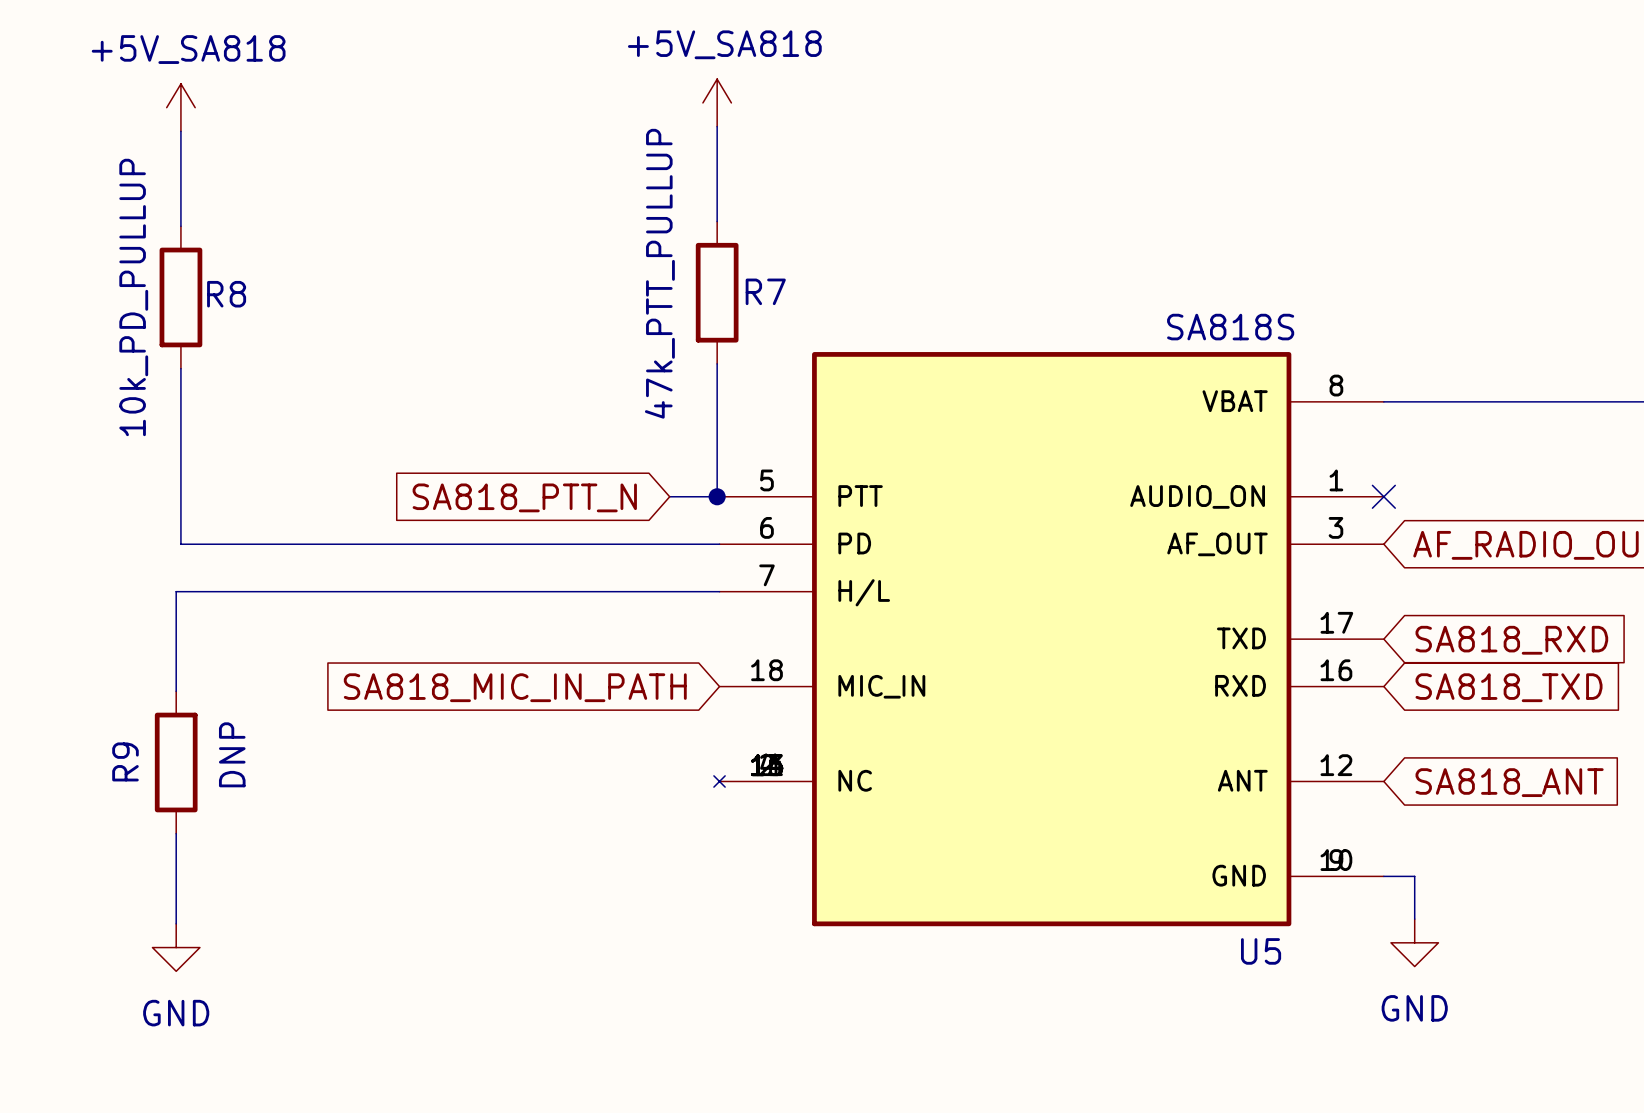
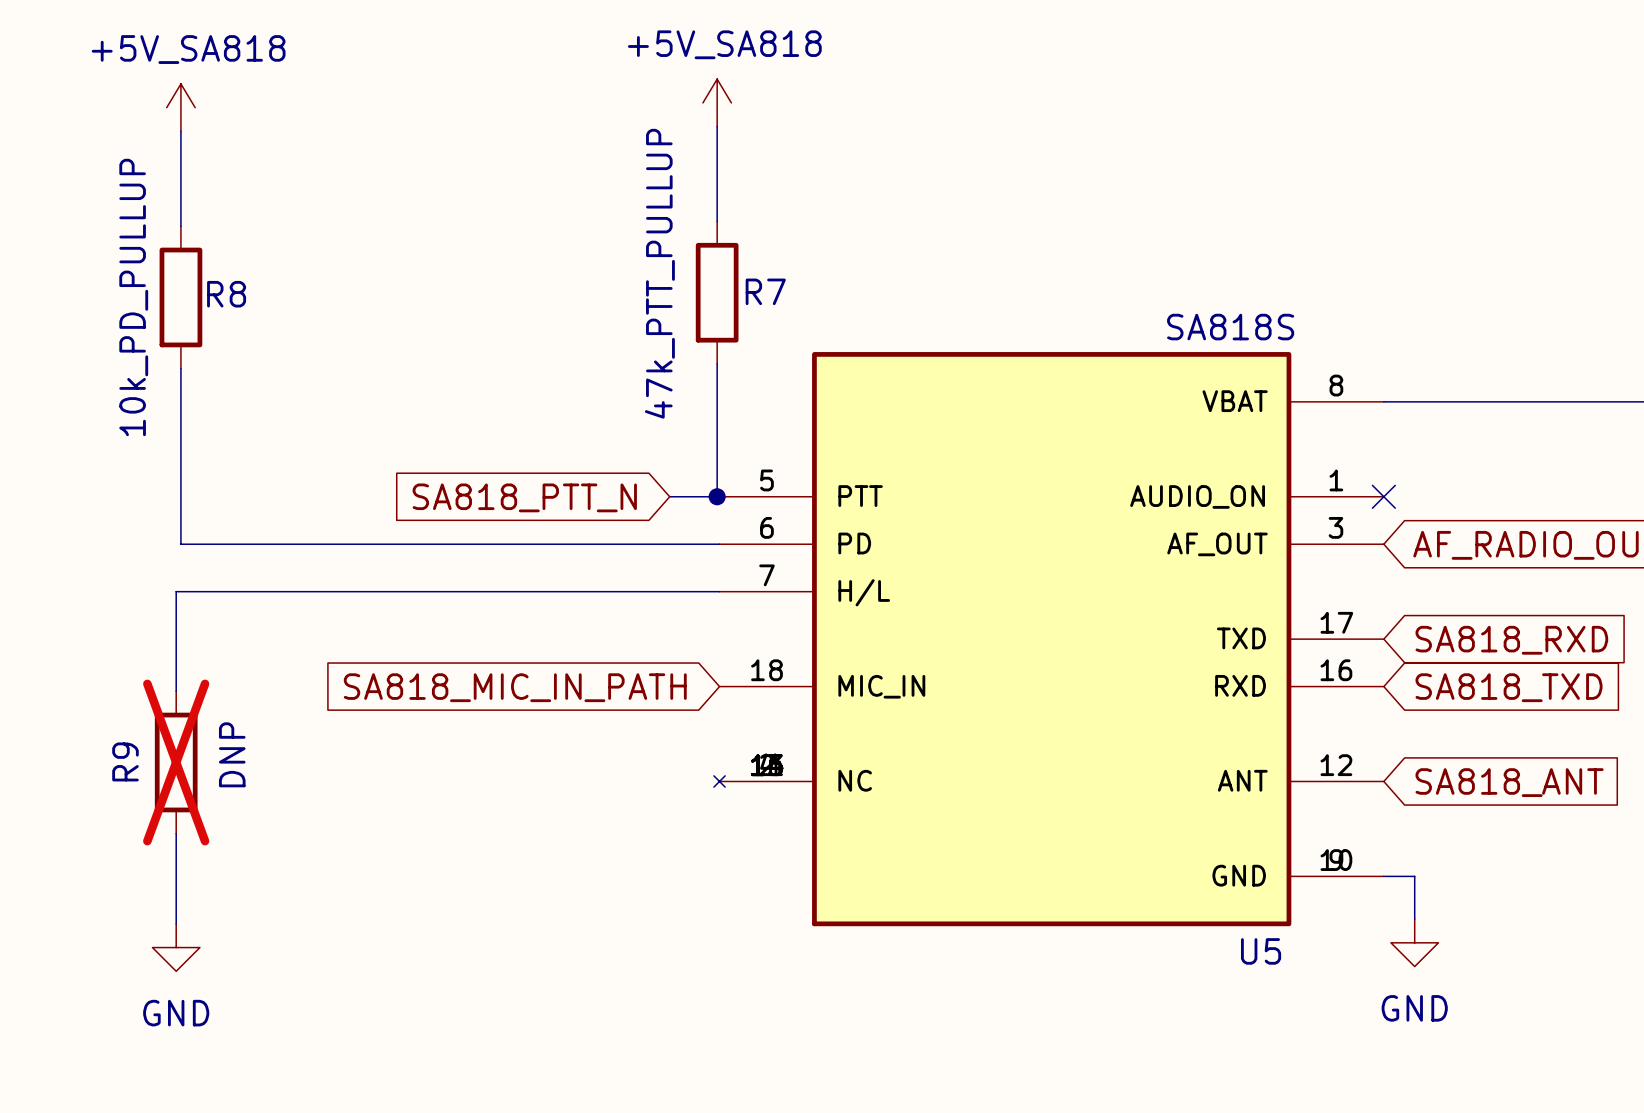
R9 do-not-place cross: none -> (176, 762)

